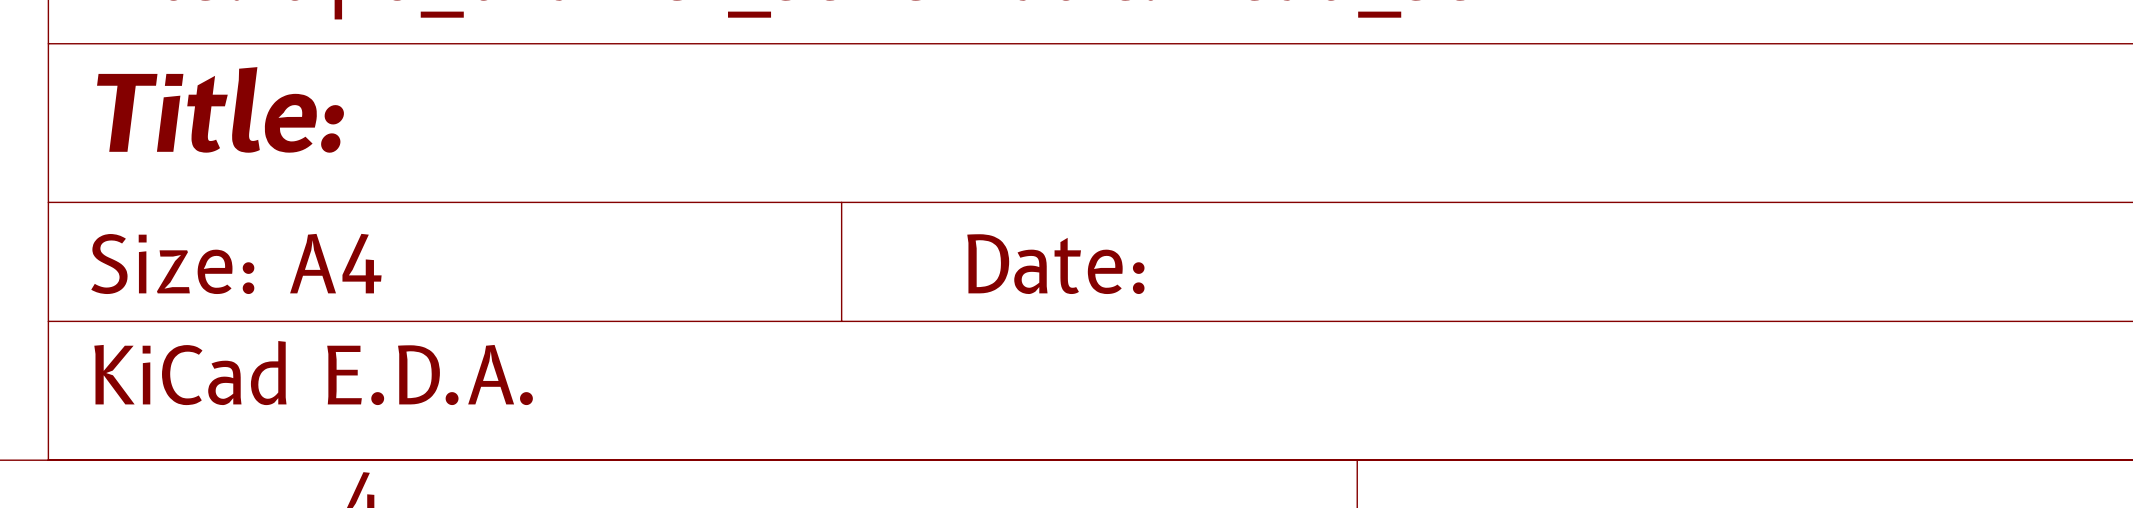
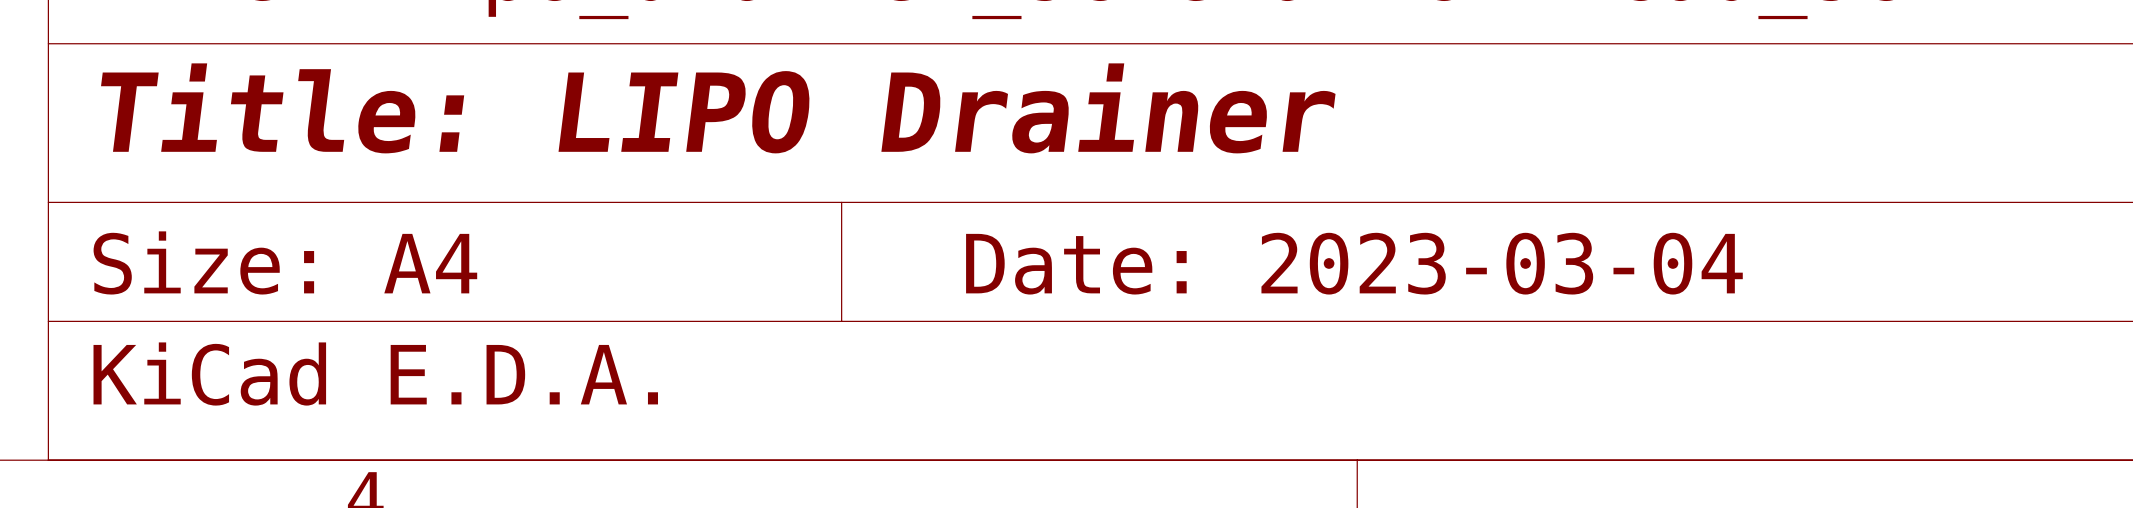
title block: Title: (220, 109) -> Title: LIPO Drainer (718, 108)
title block: Date: (1055, 264) -> Date: 2023-03-04 (1354, 263)

